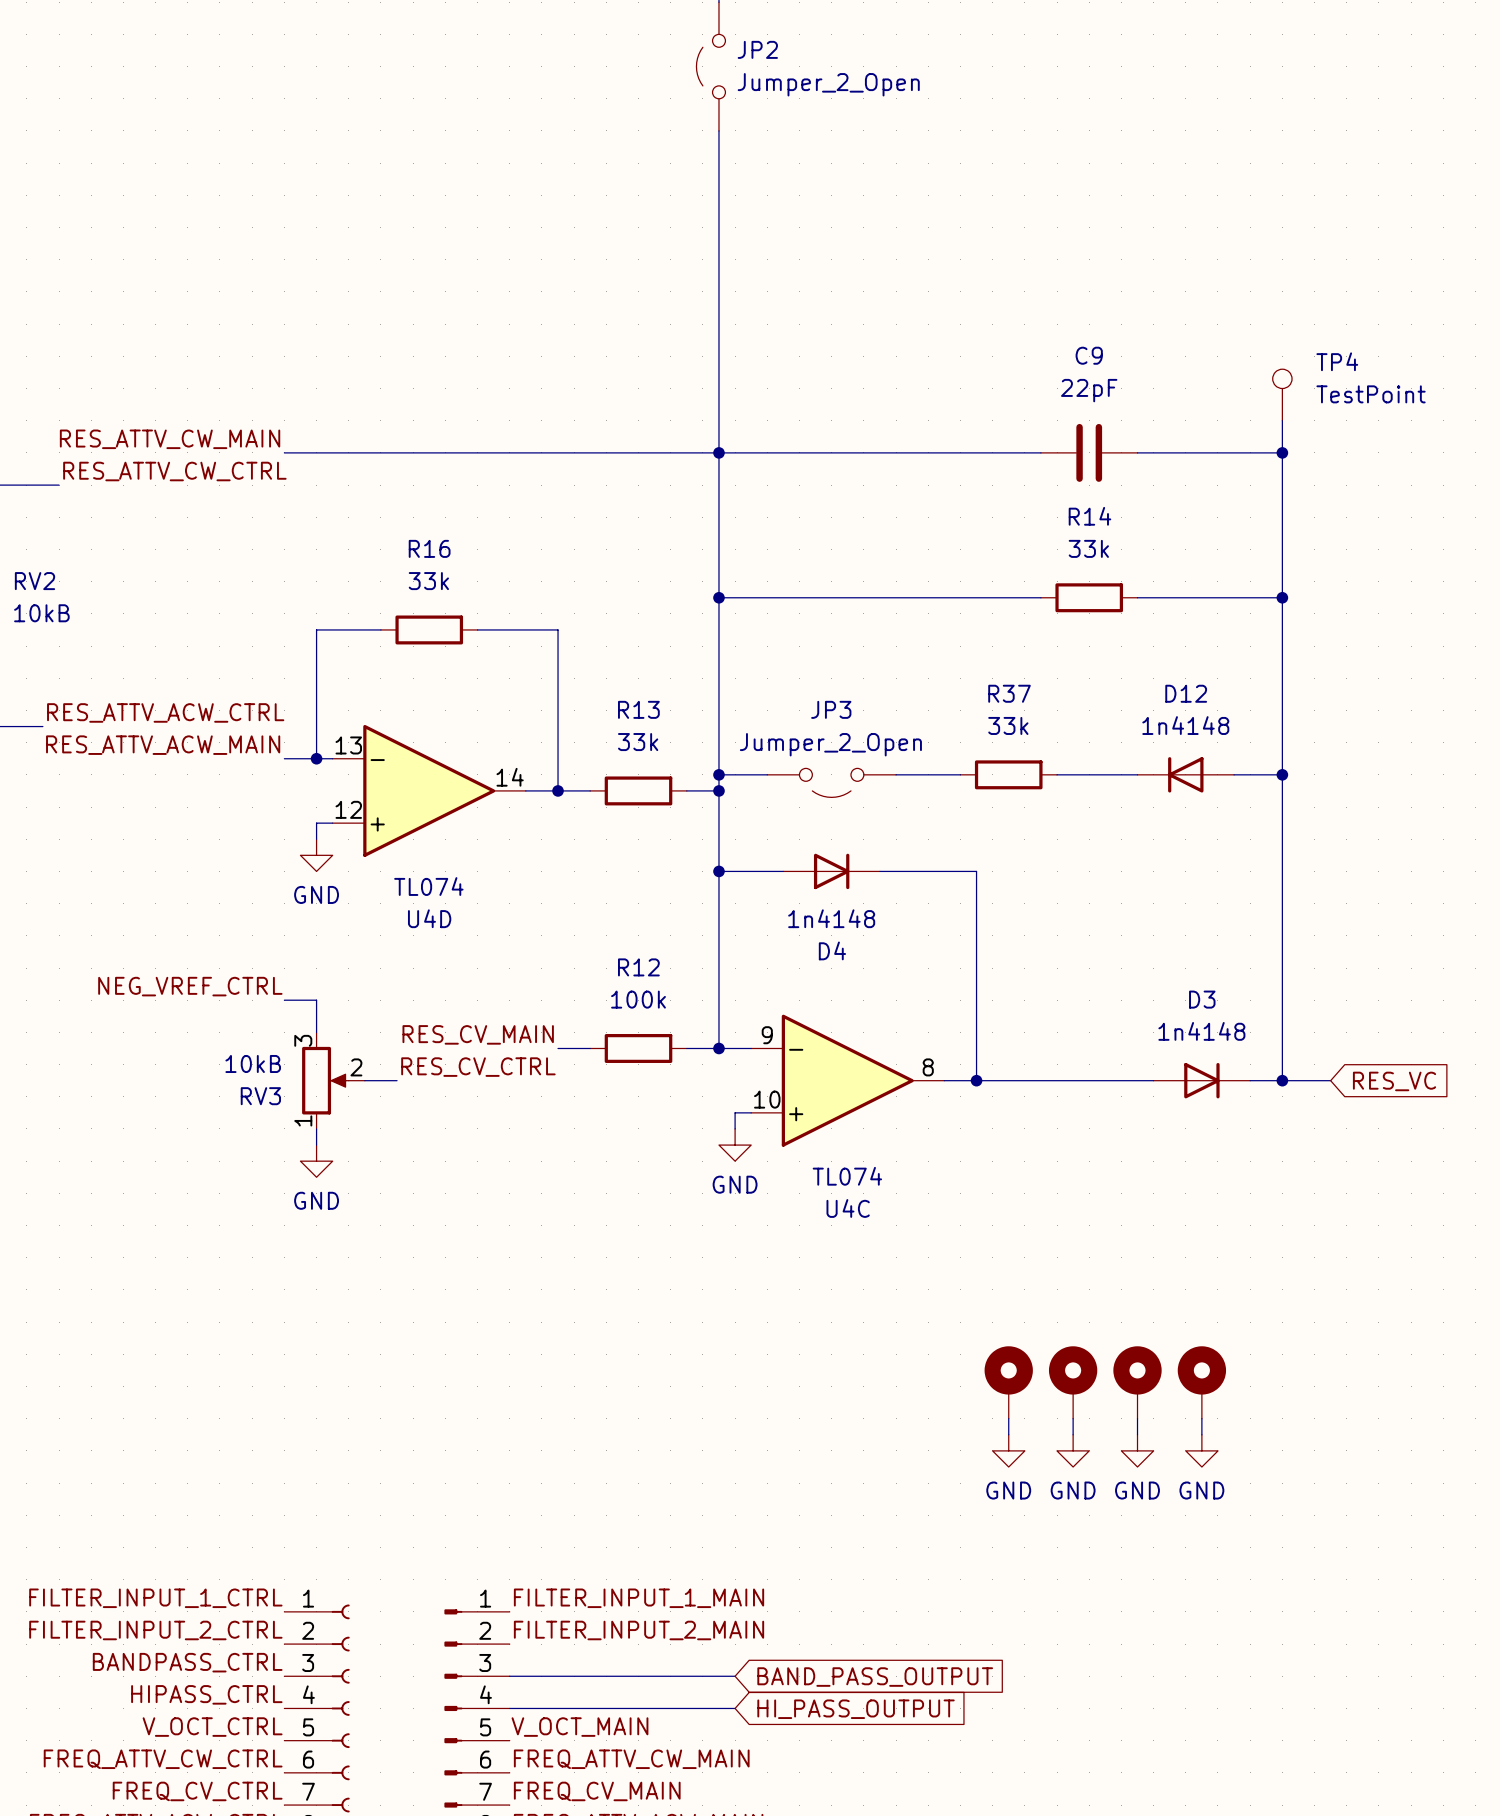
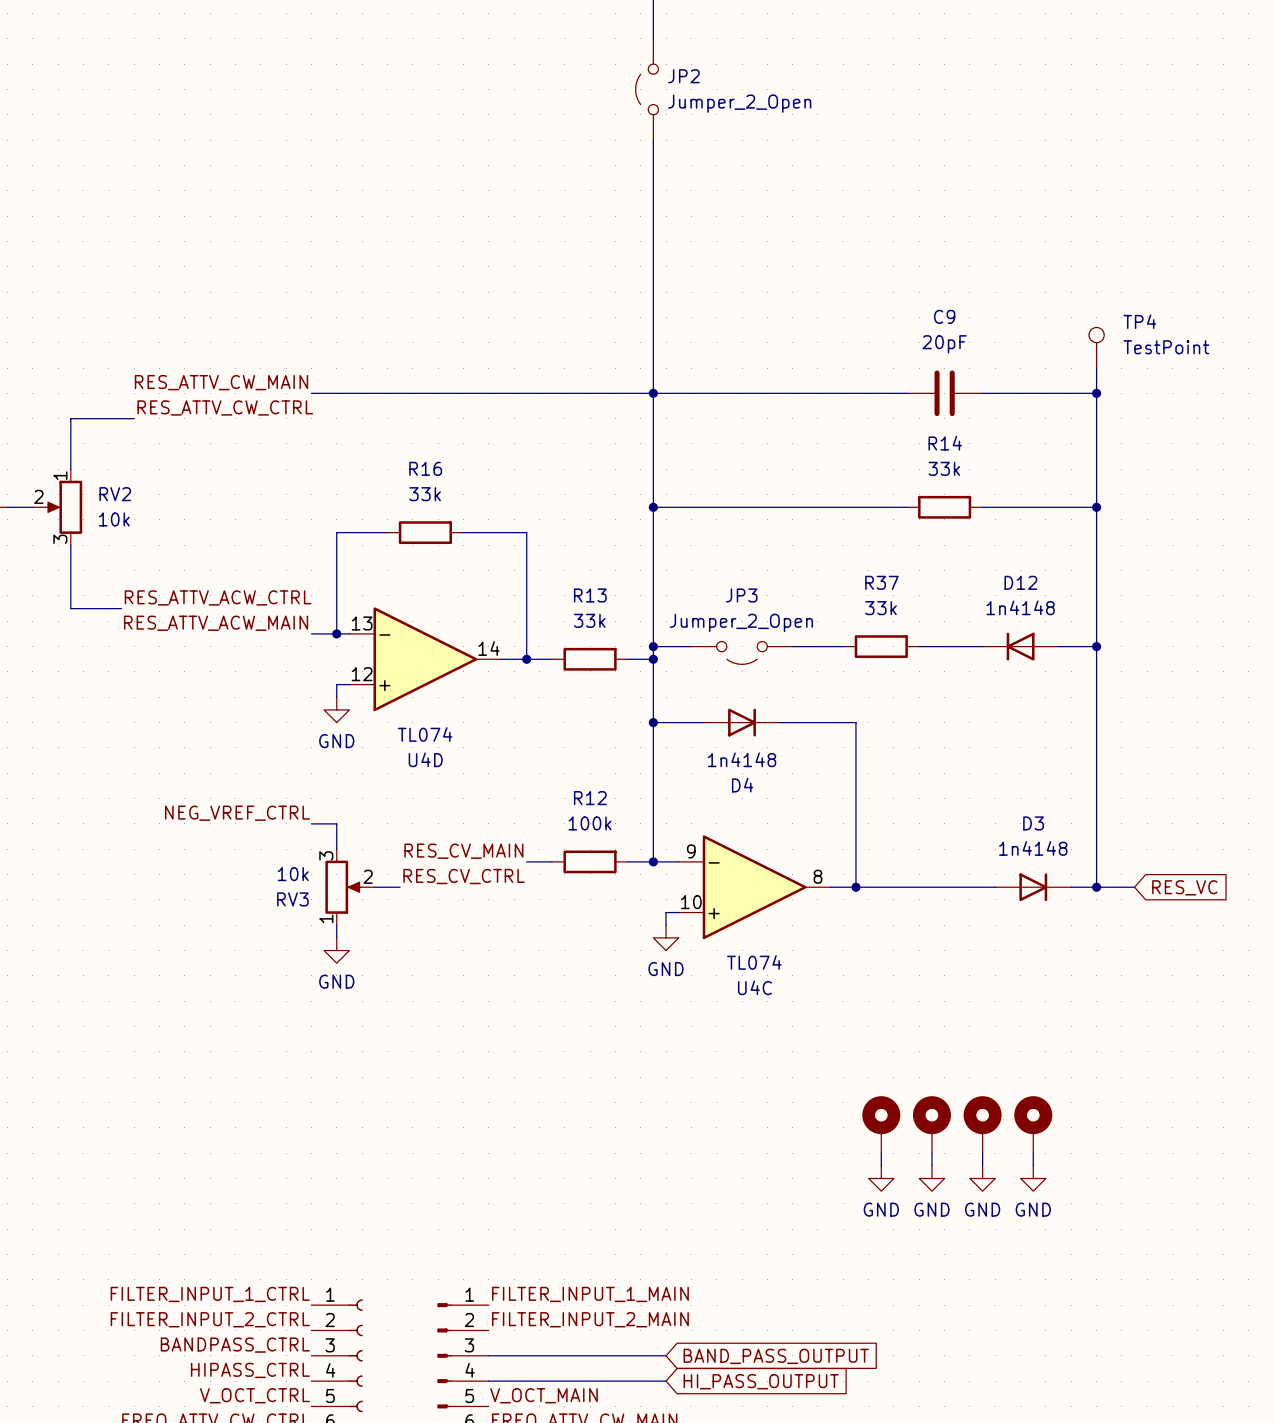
C9 value: 22pF (1089, 390) -> 20pF (944, 344)
RV2 value: 10kB (41, 613) -> 10k (114, 519)
RV3 value: 10kB (253, 1063) -> 10k (293, 874)

